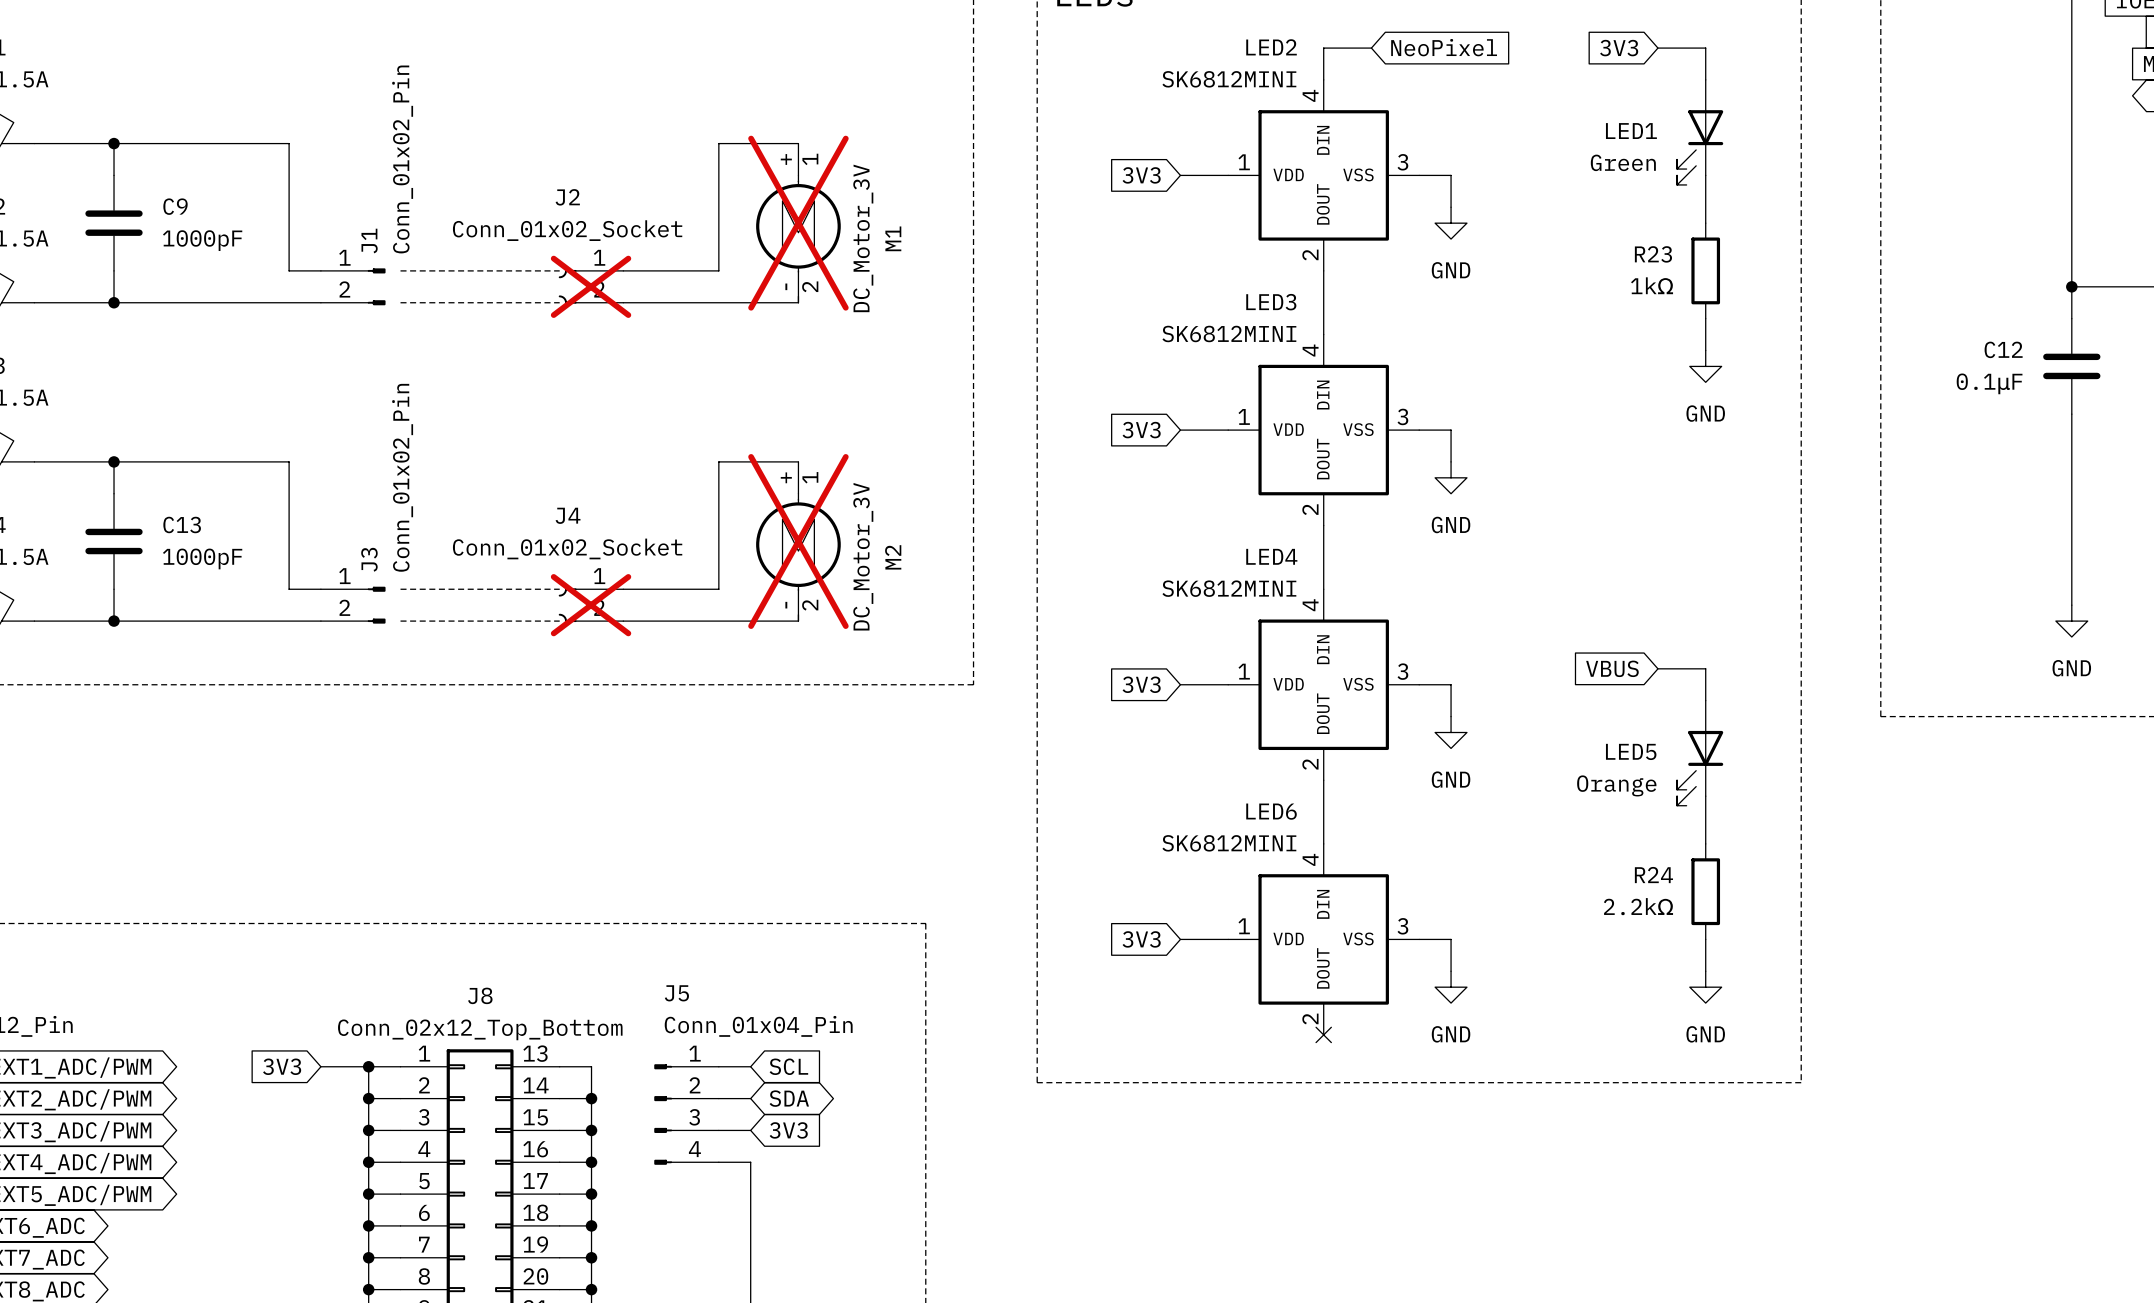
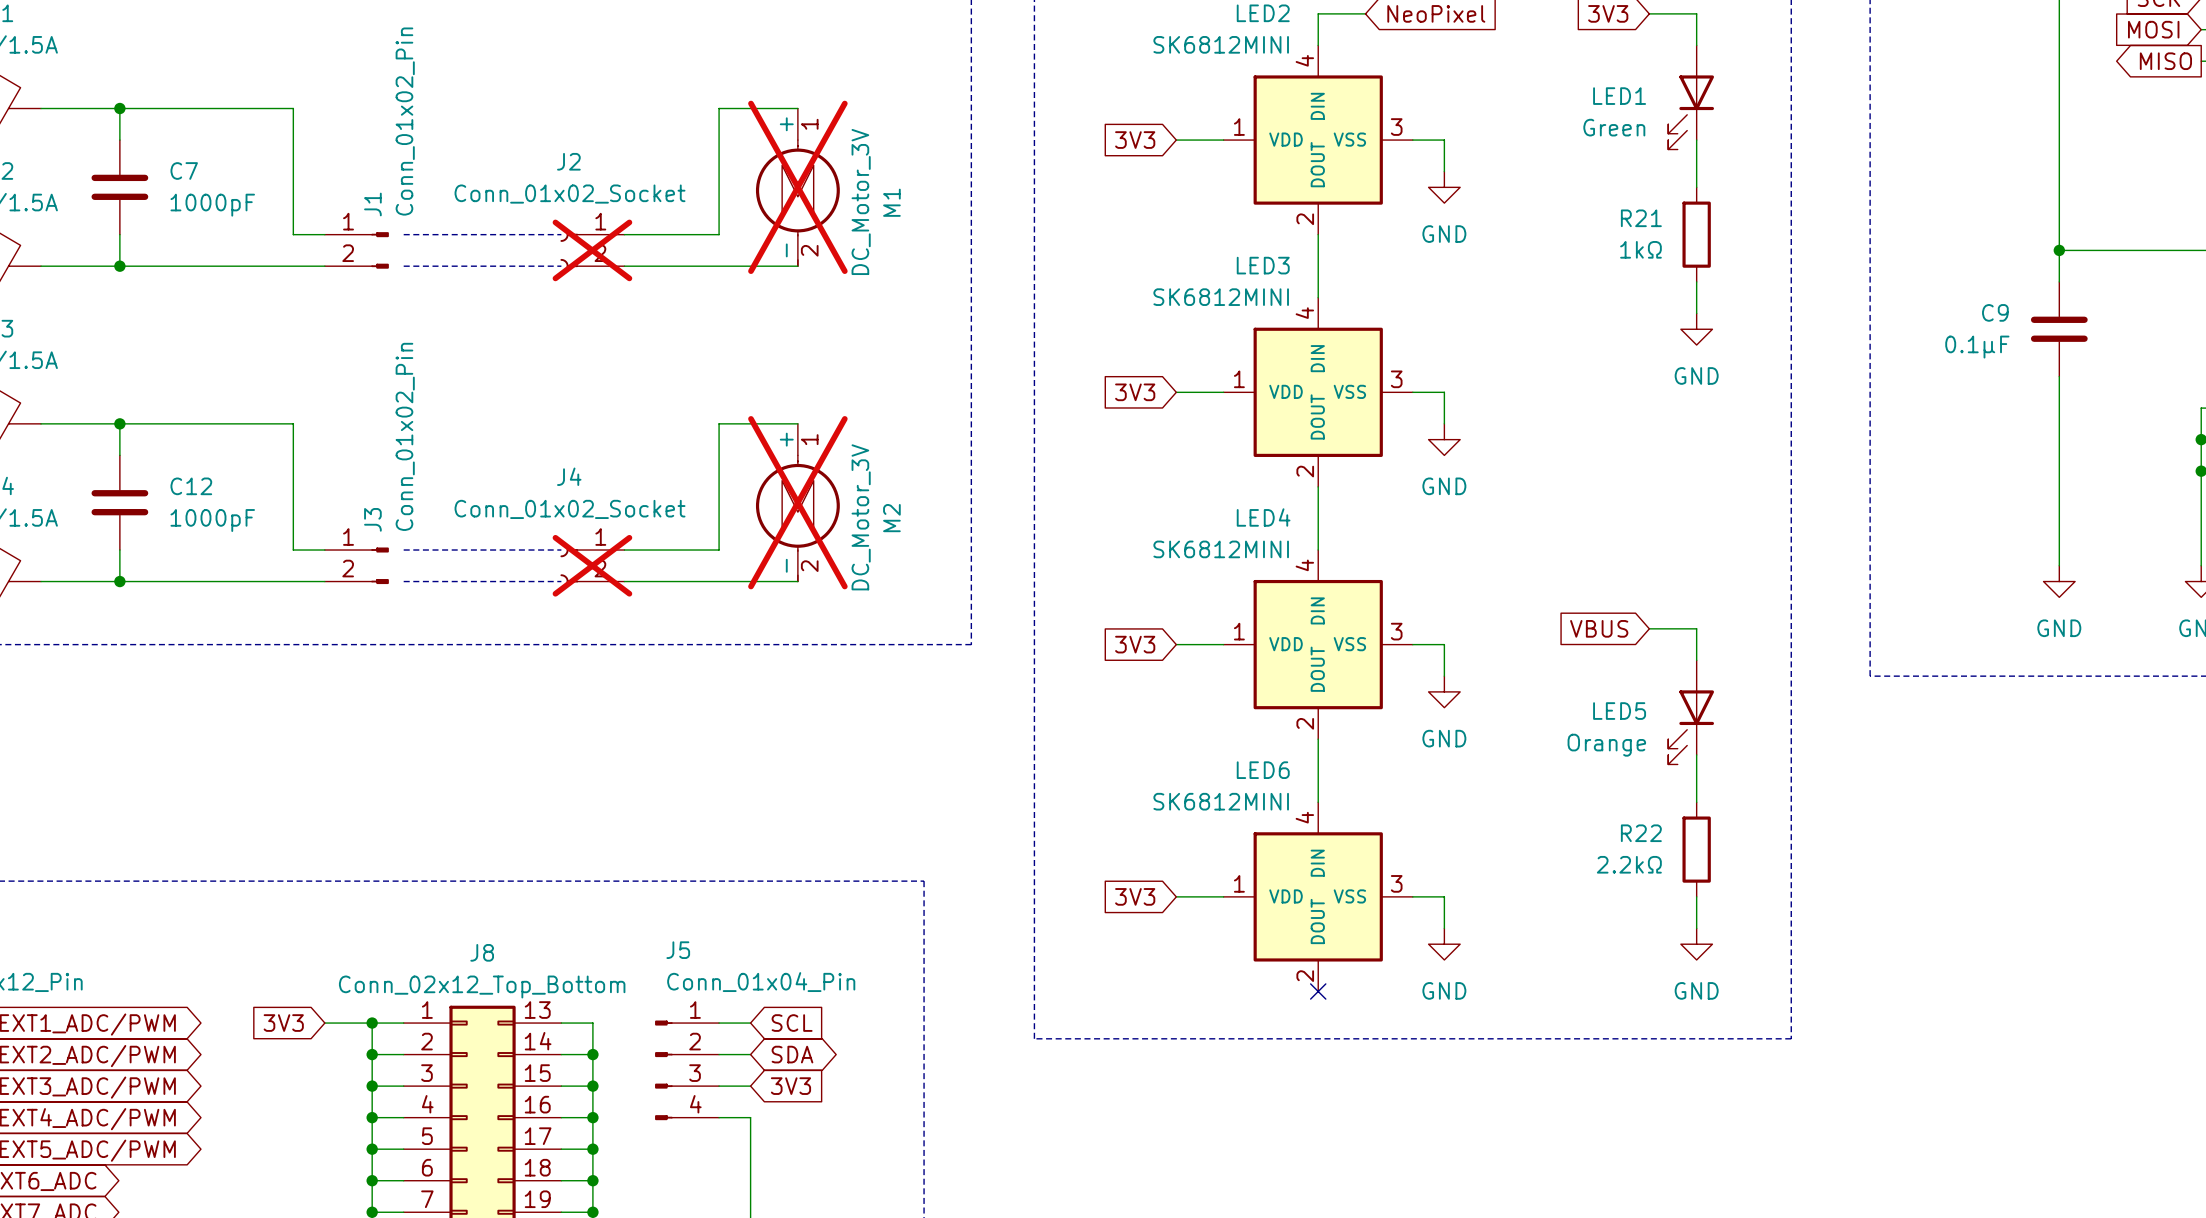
C9 name: C9 (175, 206) -> C7 (184, 170)
R23 name: R23 (1653, 254) -> R21 (1641, 218)
C12 name: C12 (2003, 349) -> C9 (1995, 312)
C13 name: C13 (182, 524) -> C12 (191, 486)
R24 name: R24 (1653, 875) -> R22 (1641, 833)

